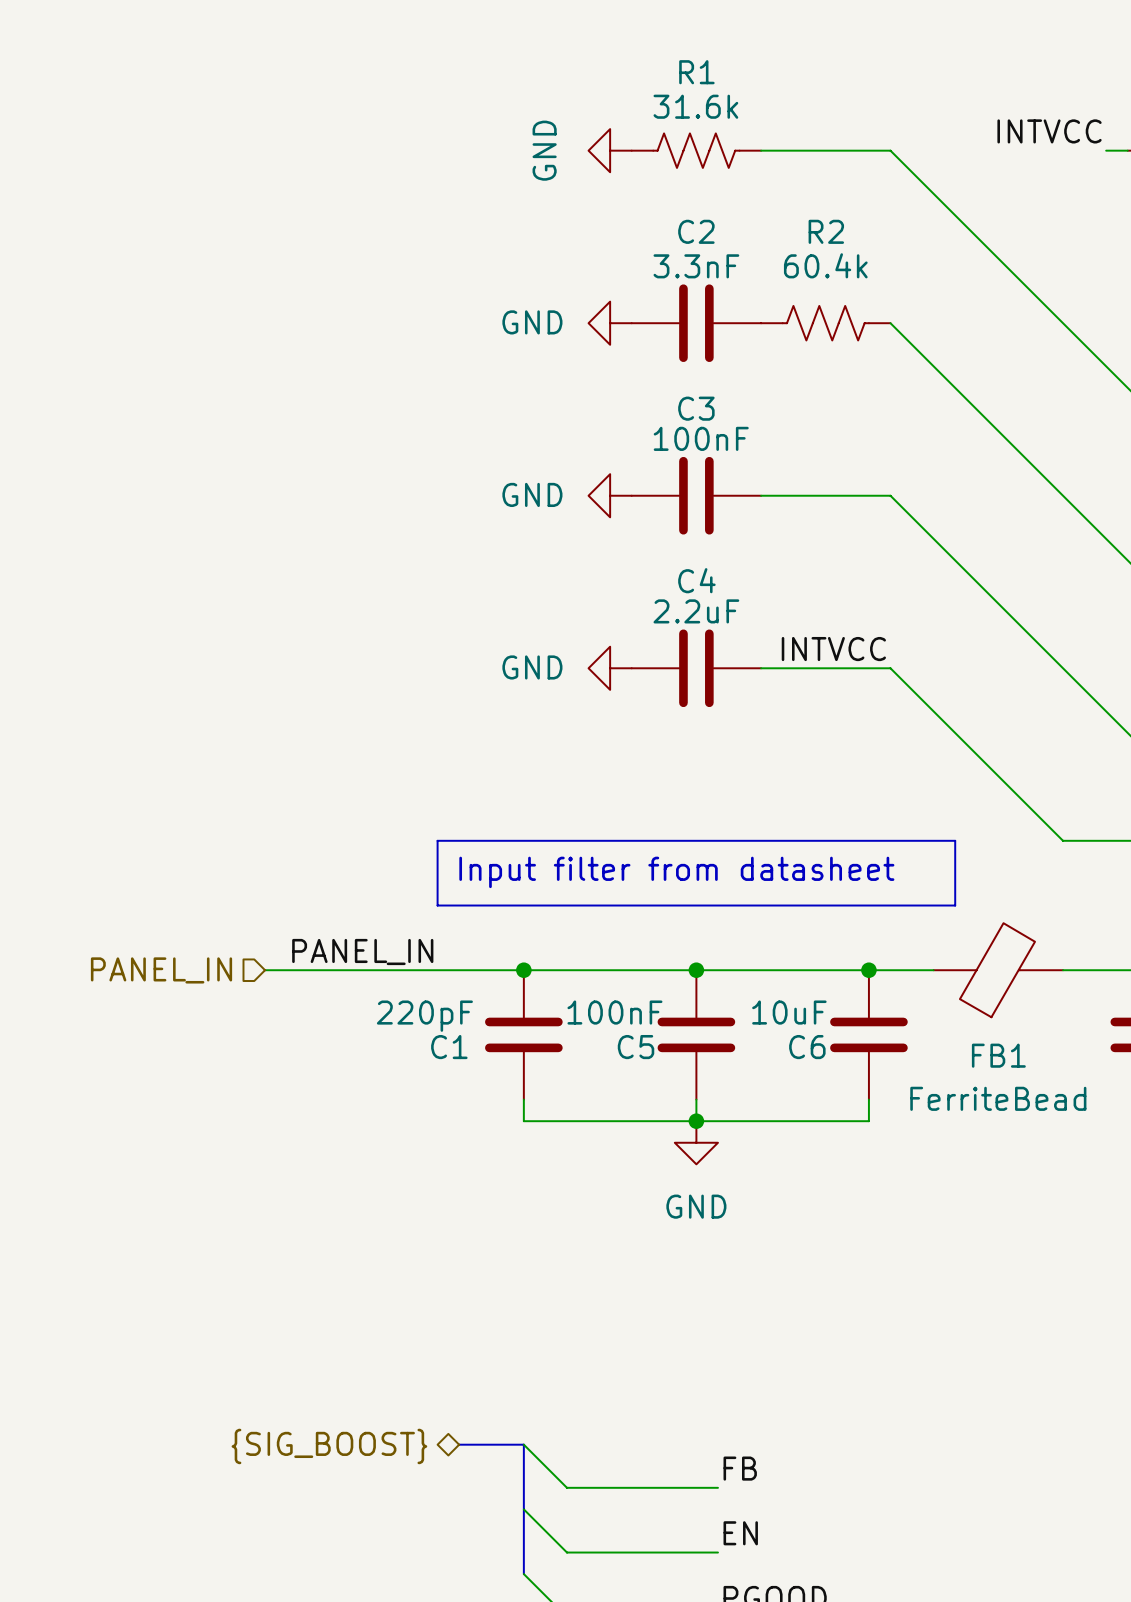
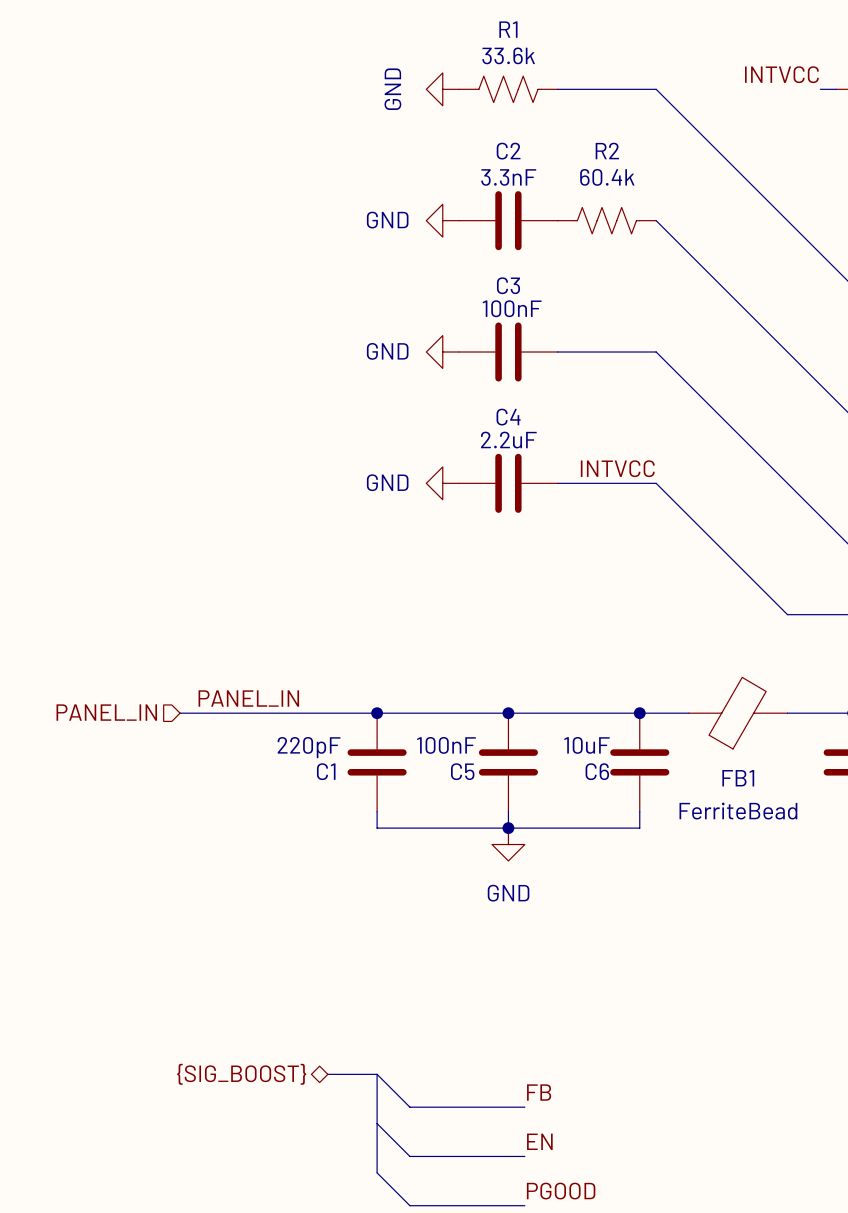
R1 value: 31.6k (695, 106) -> 33.6k (508, 55)
line: (437, 840) (955, 840) (955, 905) (437, 905) (437, 840) -> none
text: Input filter from datasheet (676, 872) -> none

